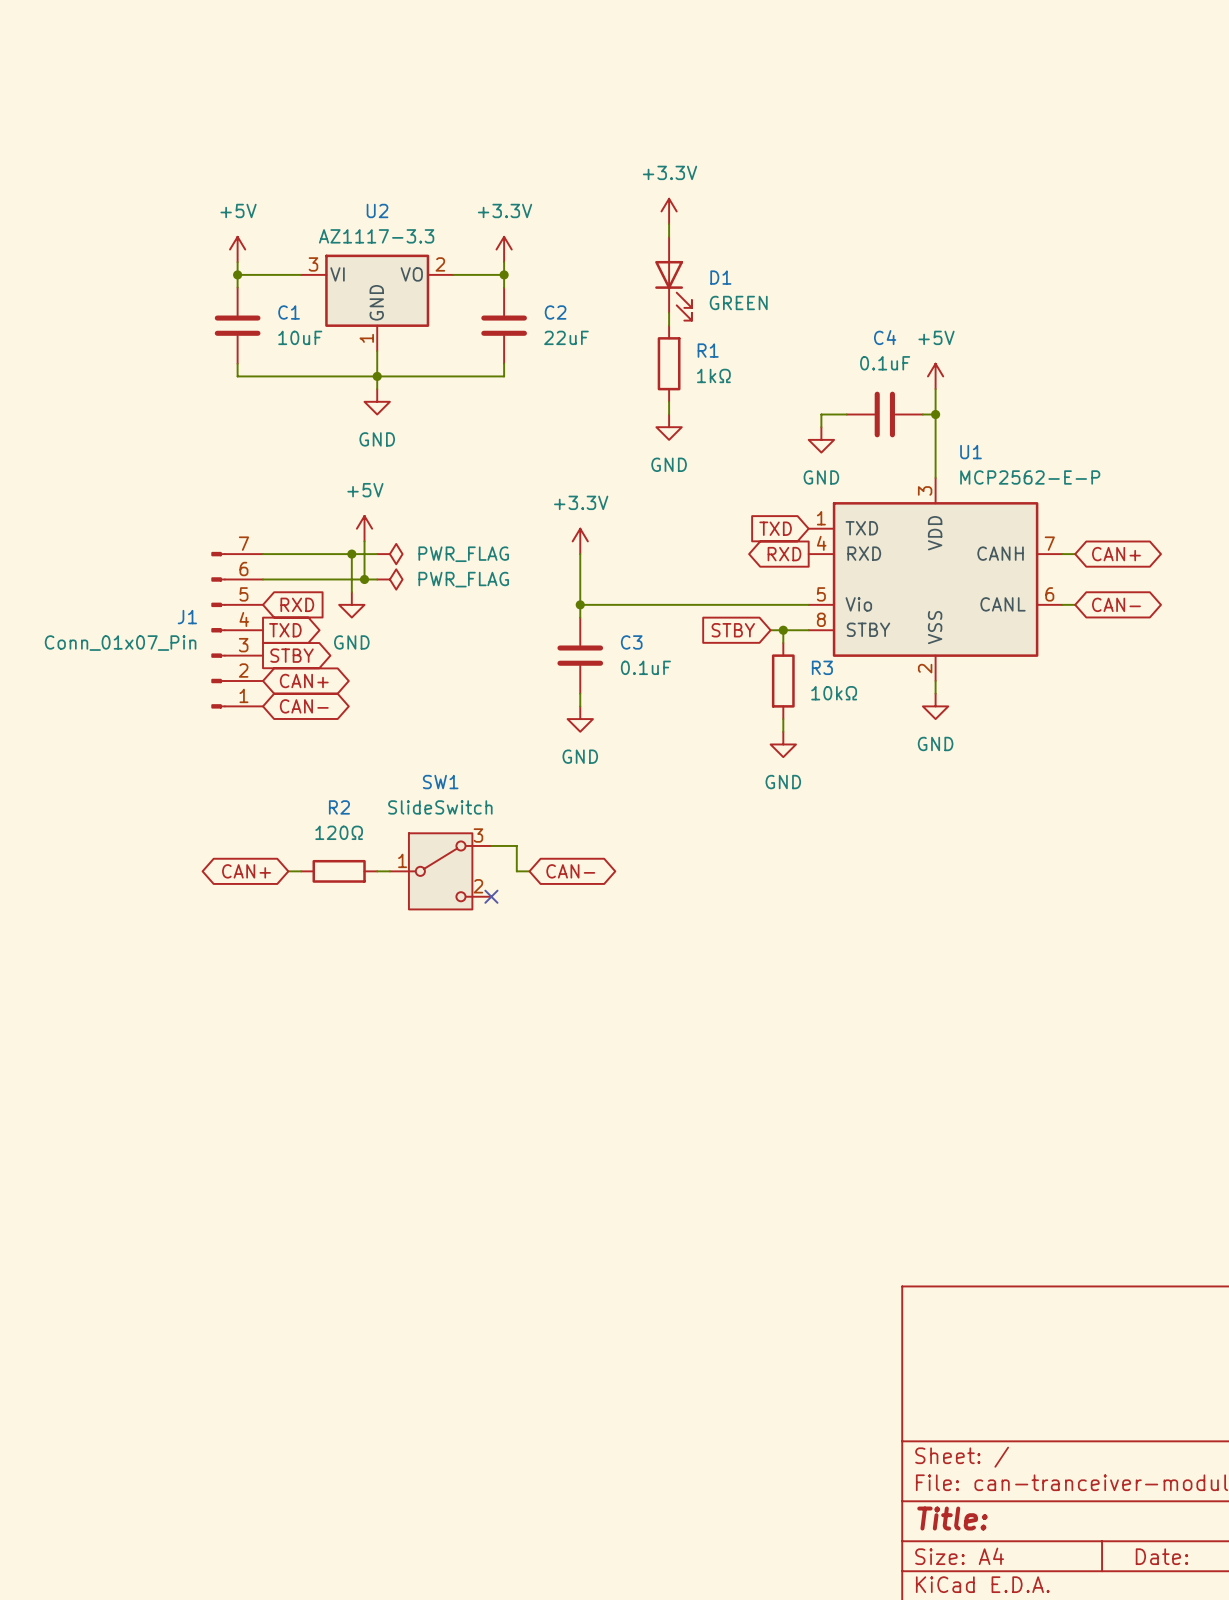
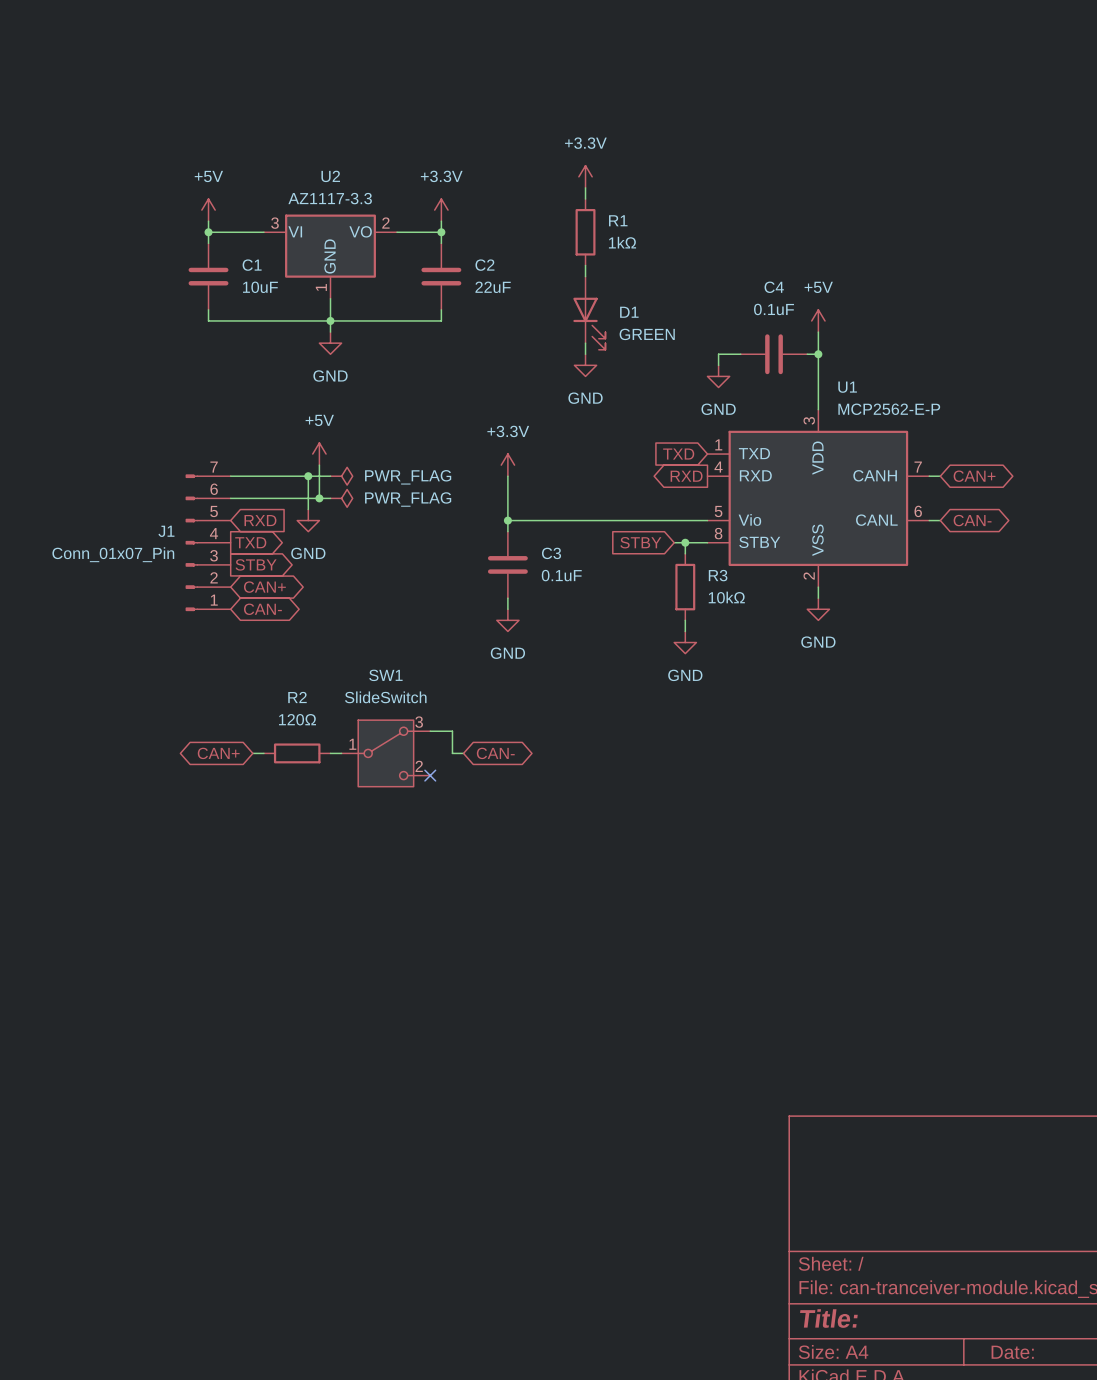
D1 position: (673, 278) -> (589, 313)
R1 position: (669, 363) -> (585, 232)

